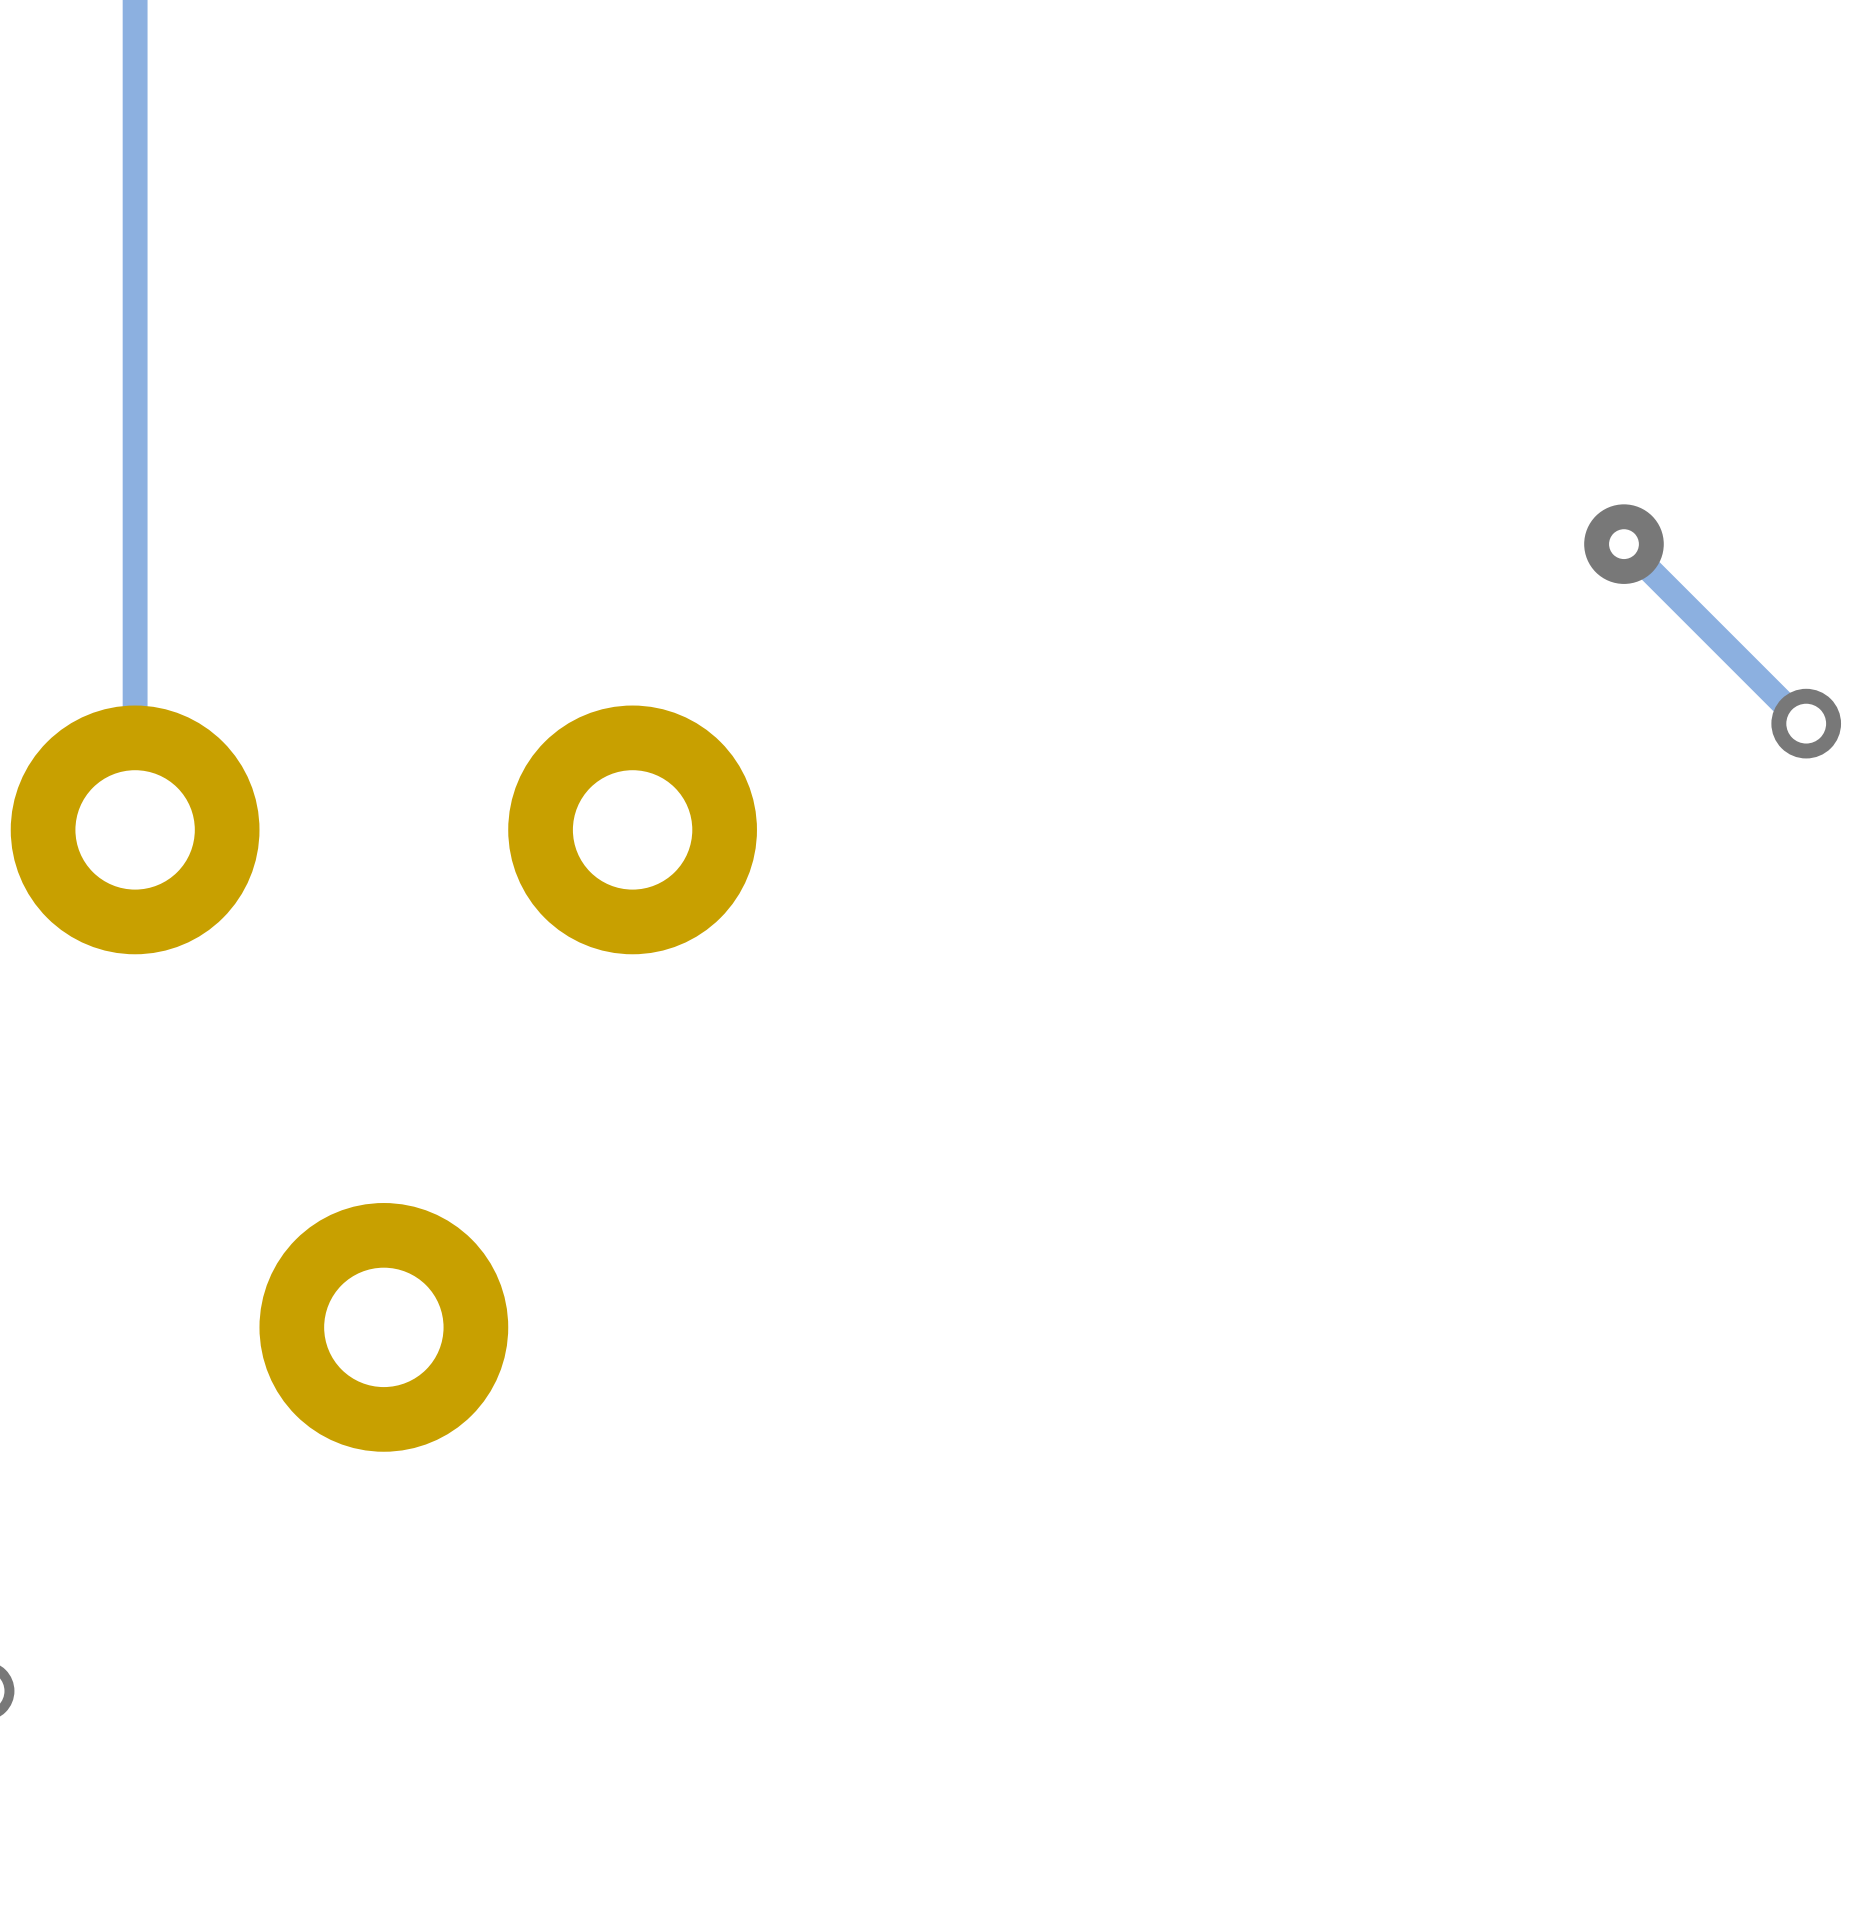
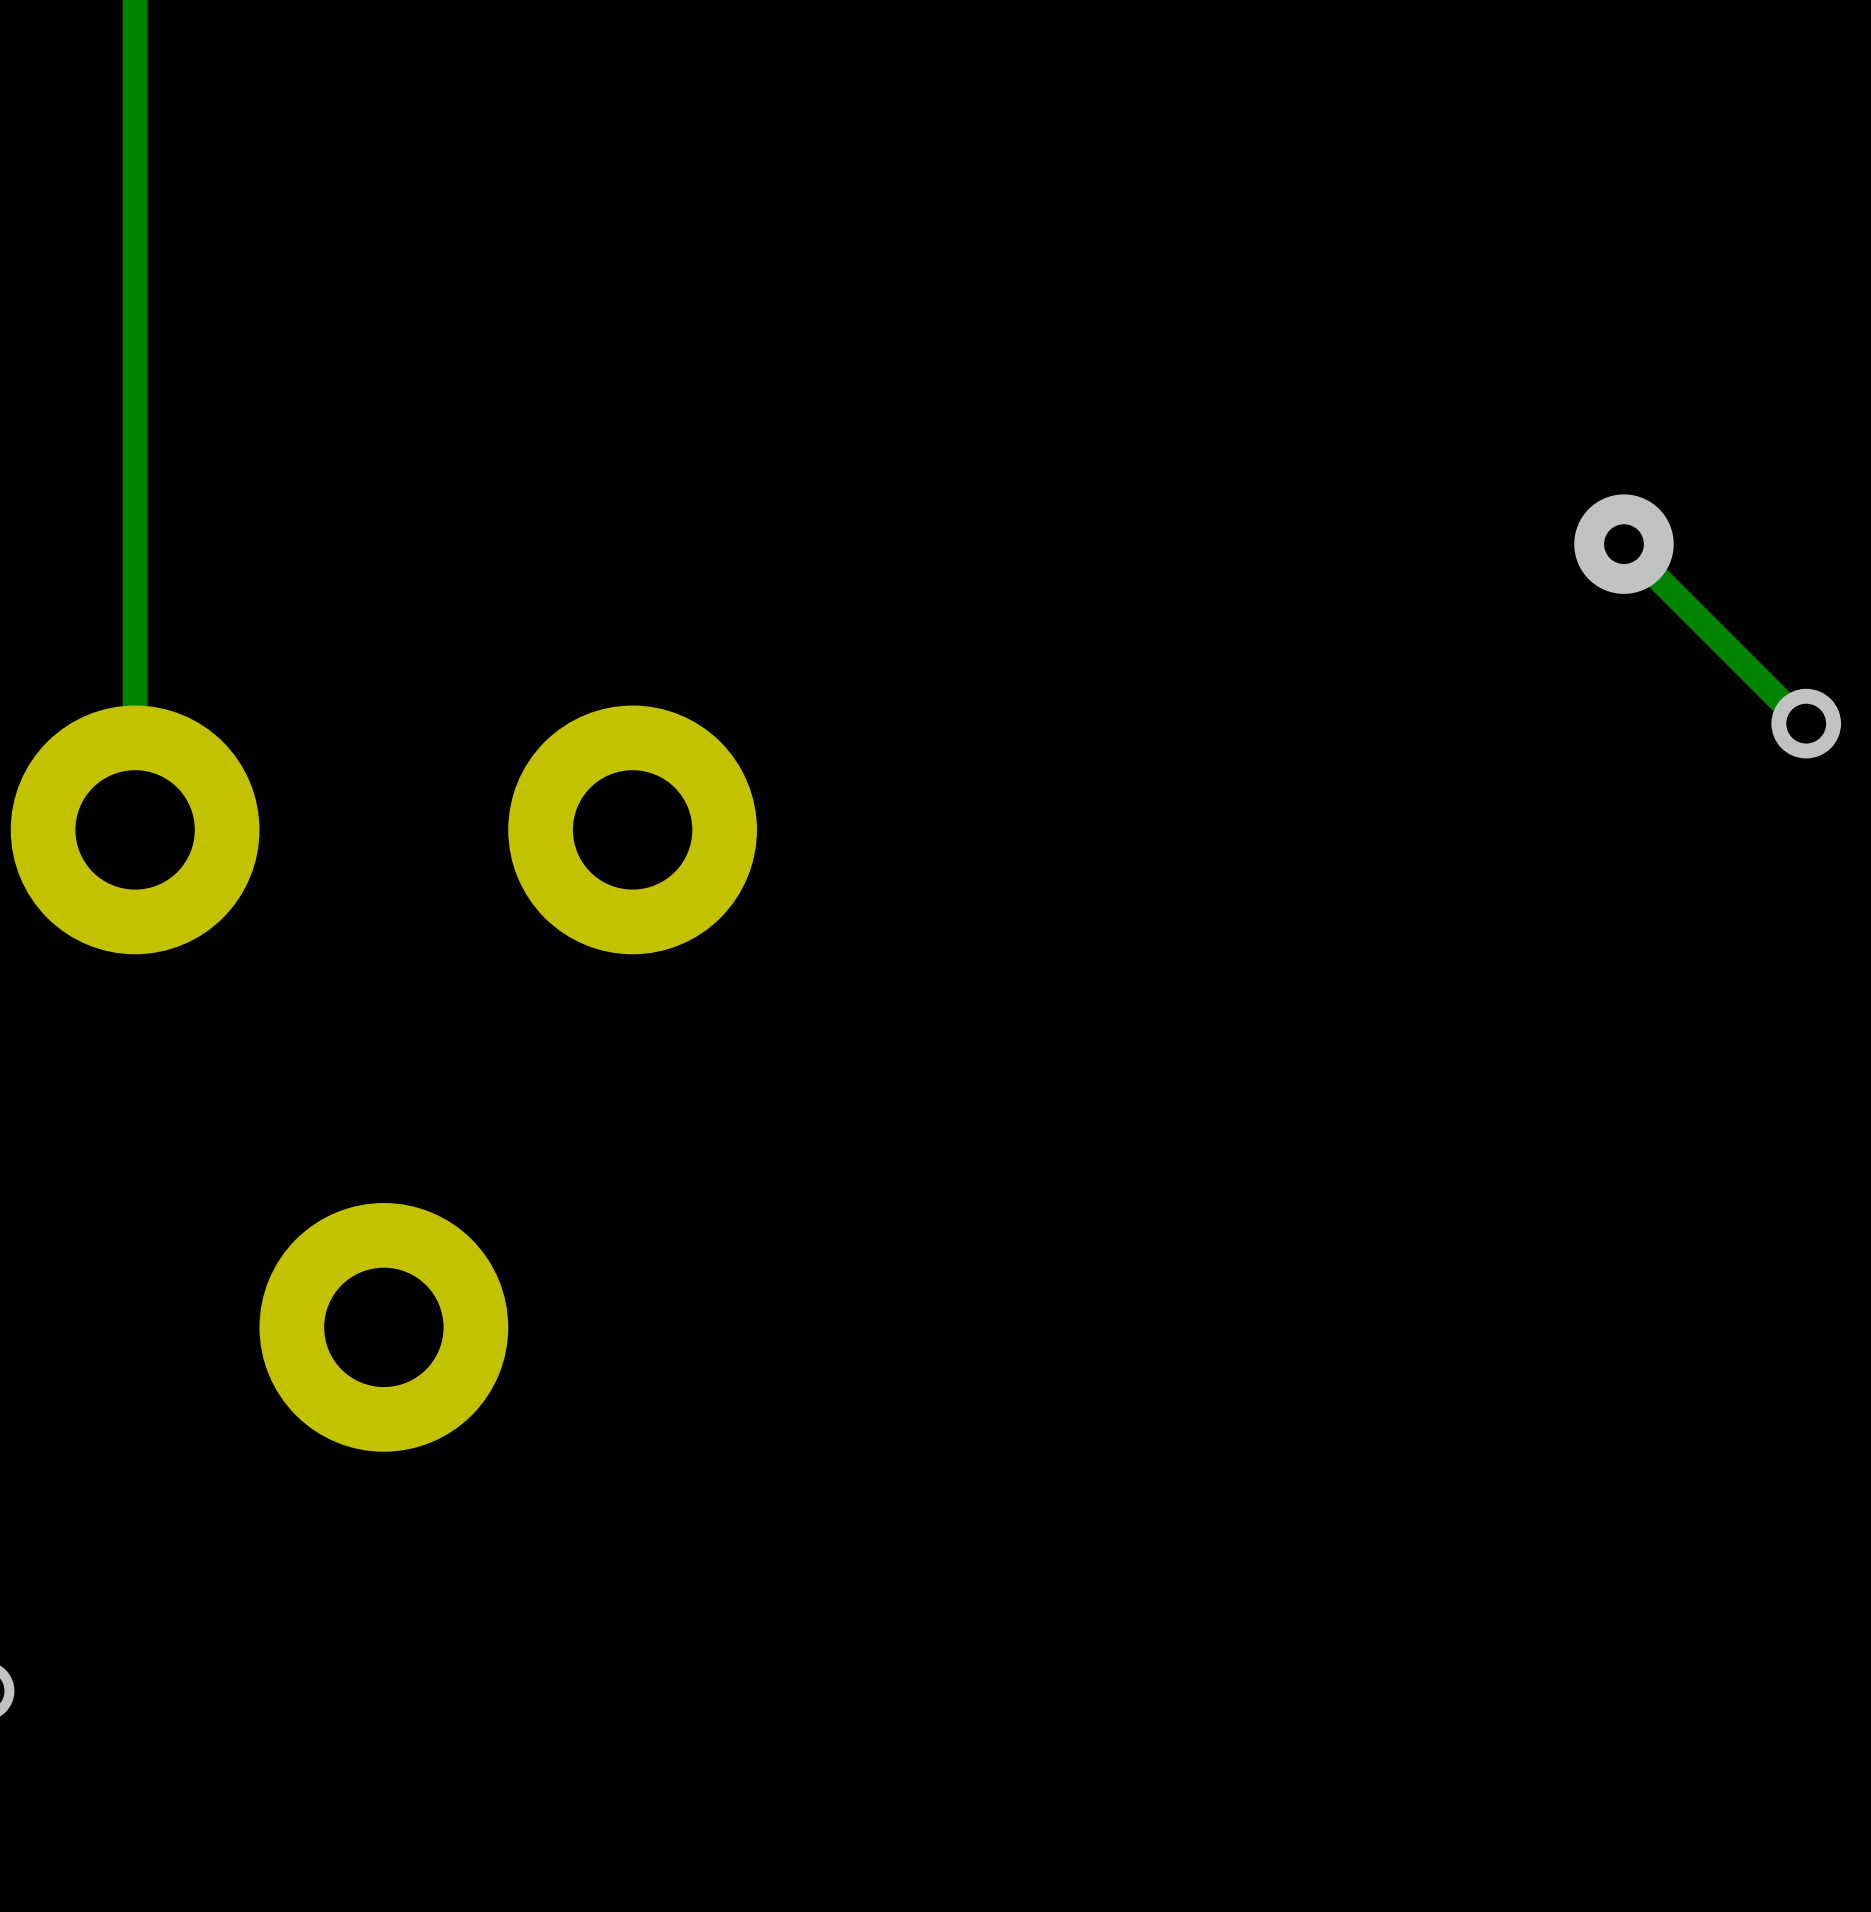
via size: [1584, 504, 1664, 584] -> [1574, 494, 1674, 594]

